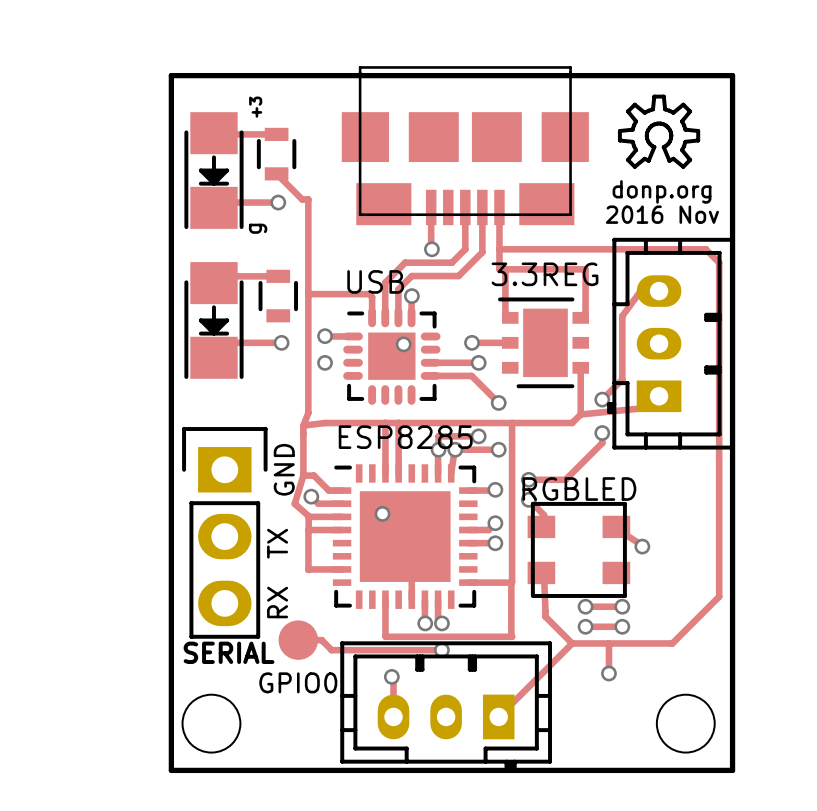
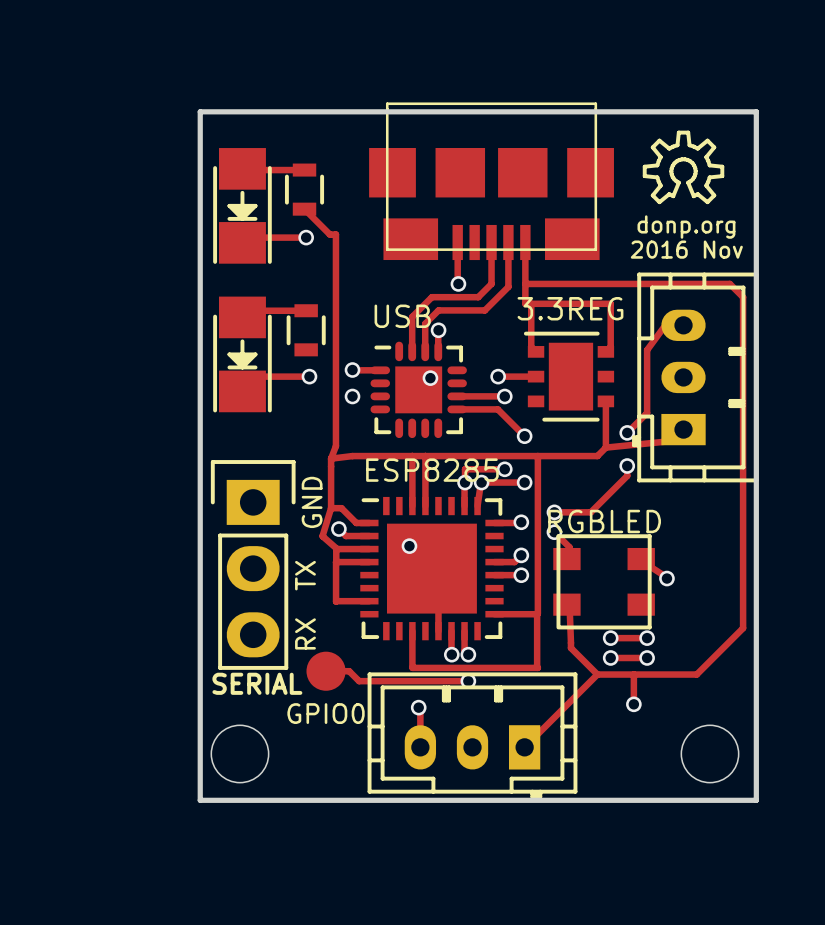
text: +3 (255, 107) -> none
text: g (258, 228) -> none
track: (308, 294) (369, 294) (372, 297) (372, 317) -> none

